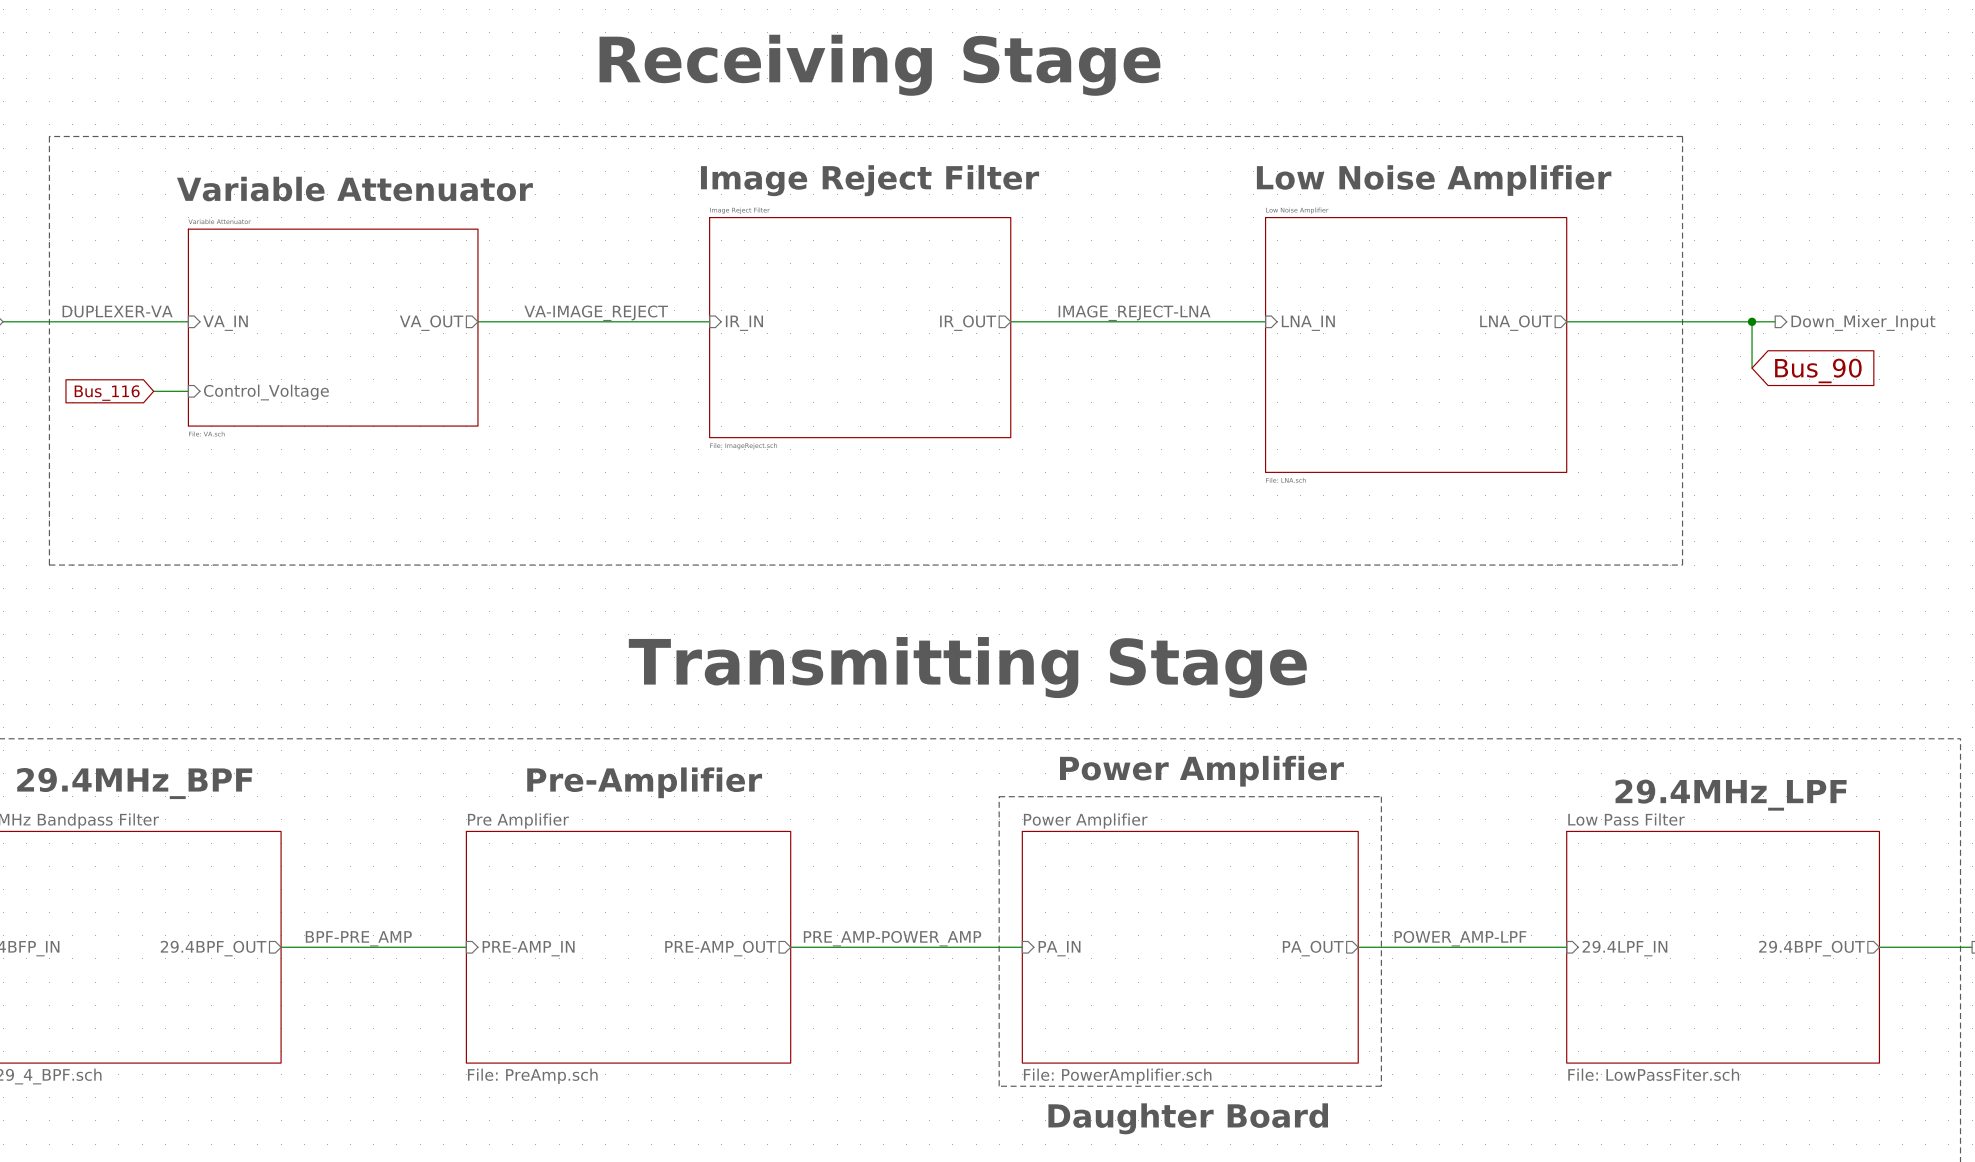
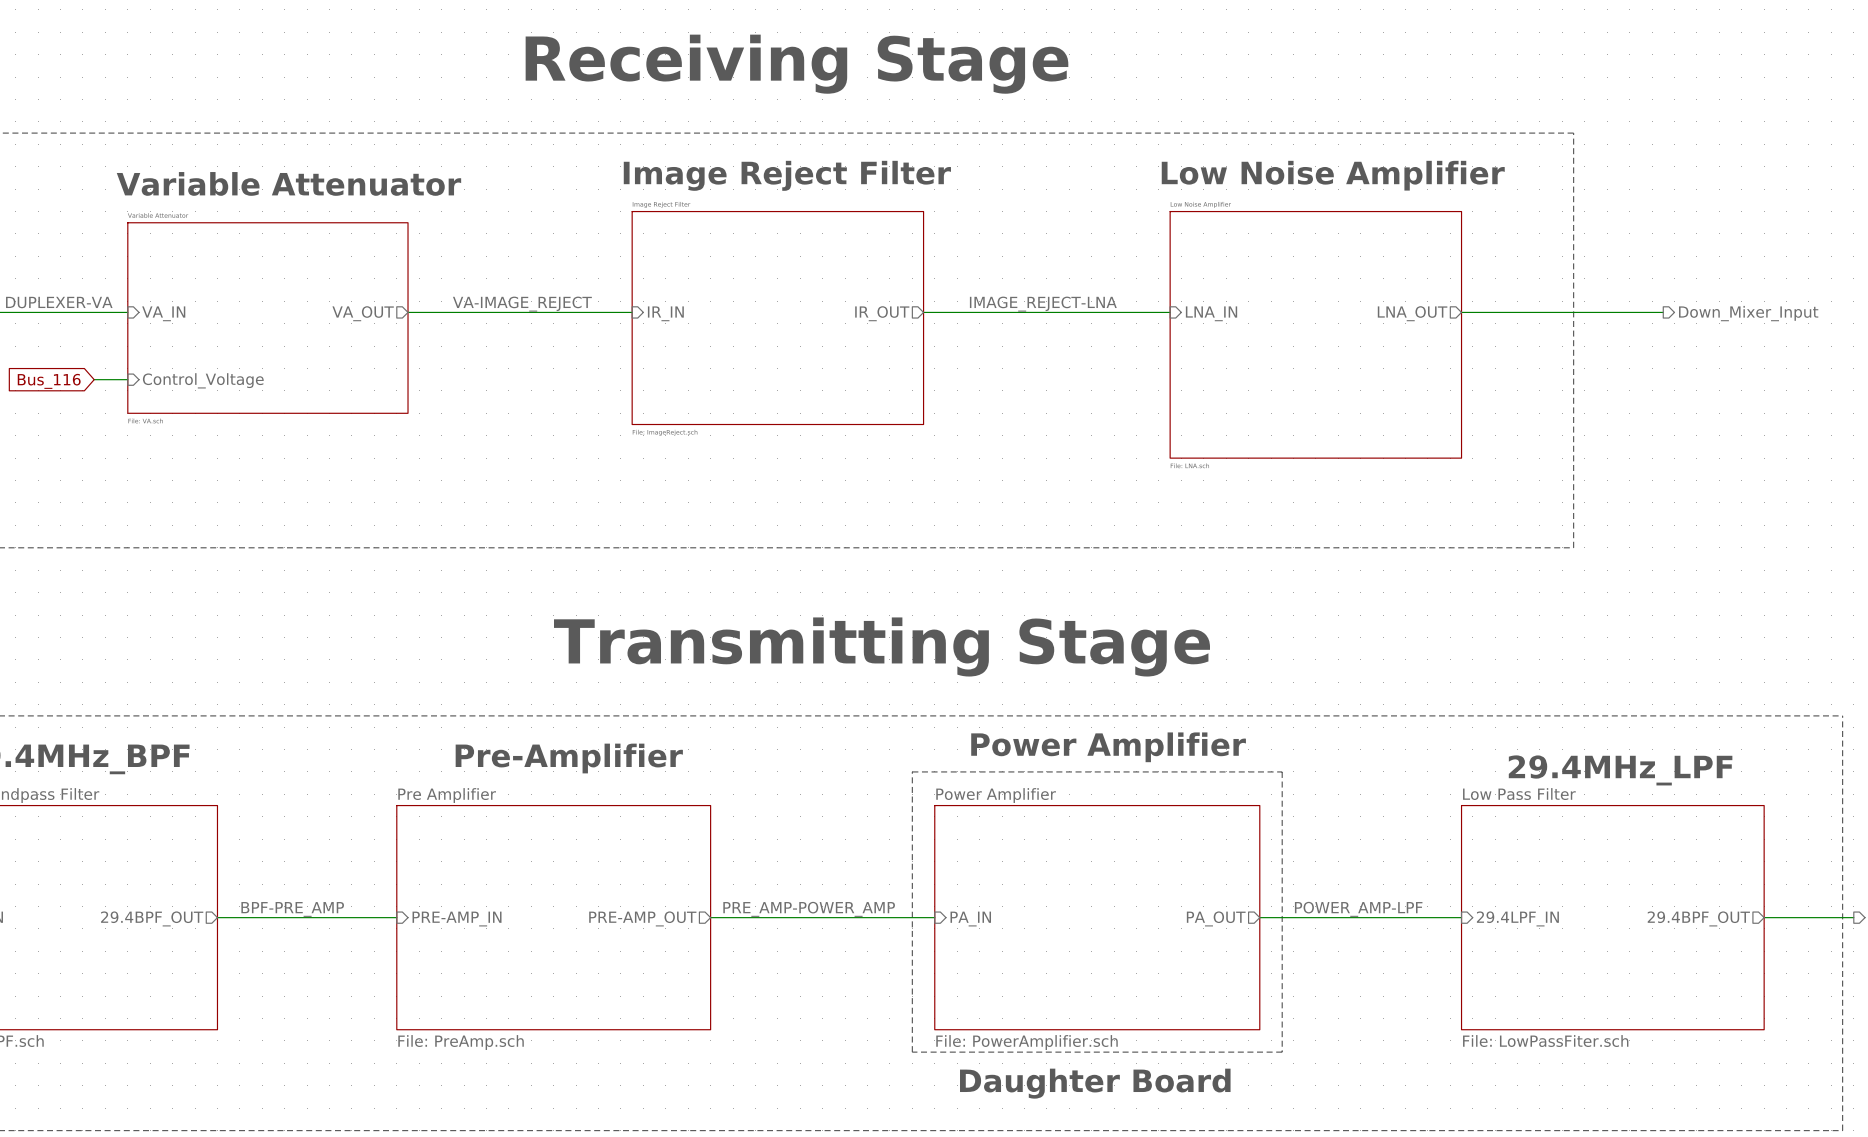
wire: (1752, 321) (1752, 368) -> none
junction: (1752, 321) -> none
global label: Bus_90 (1818, 370) -> none

